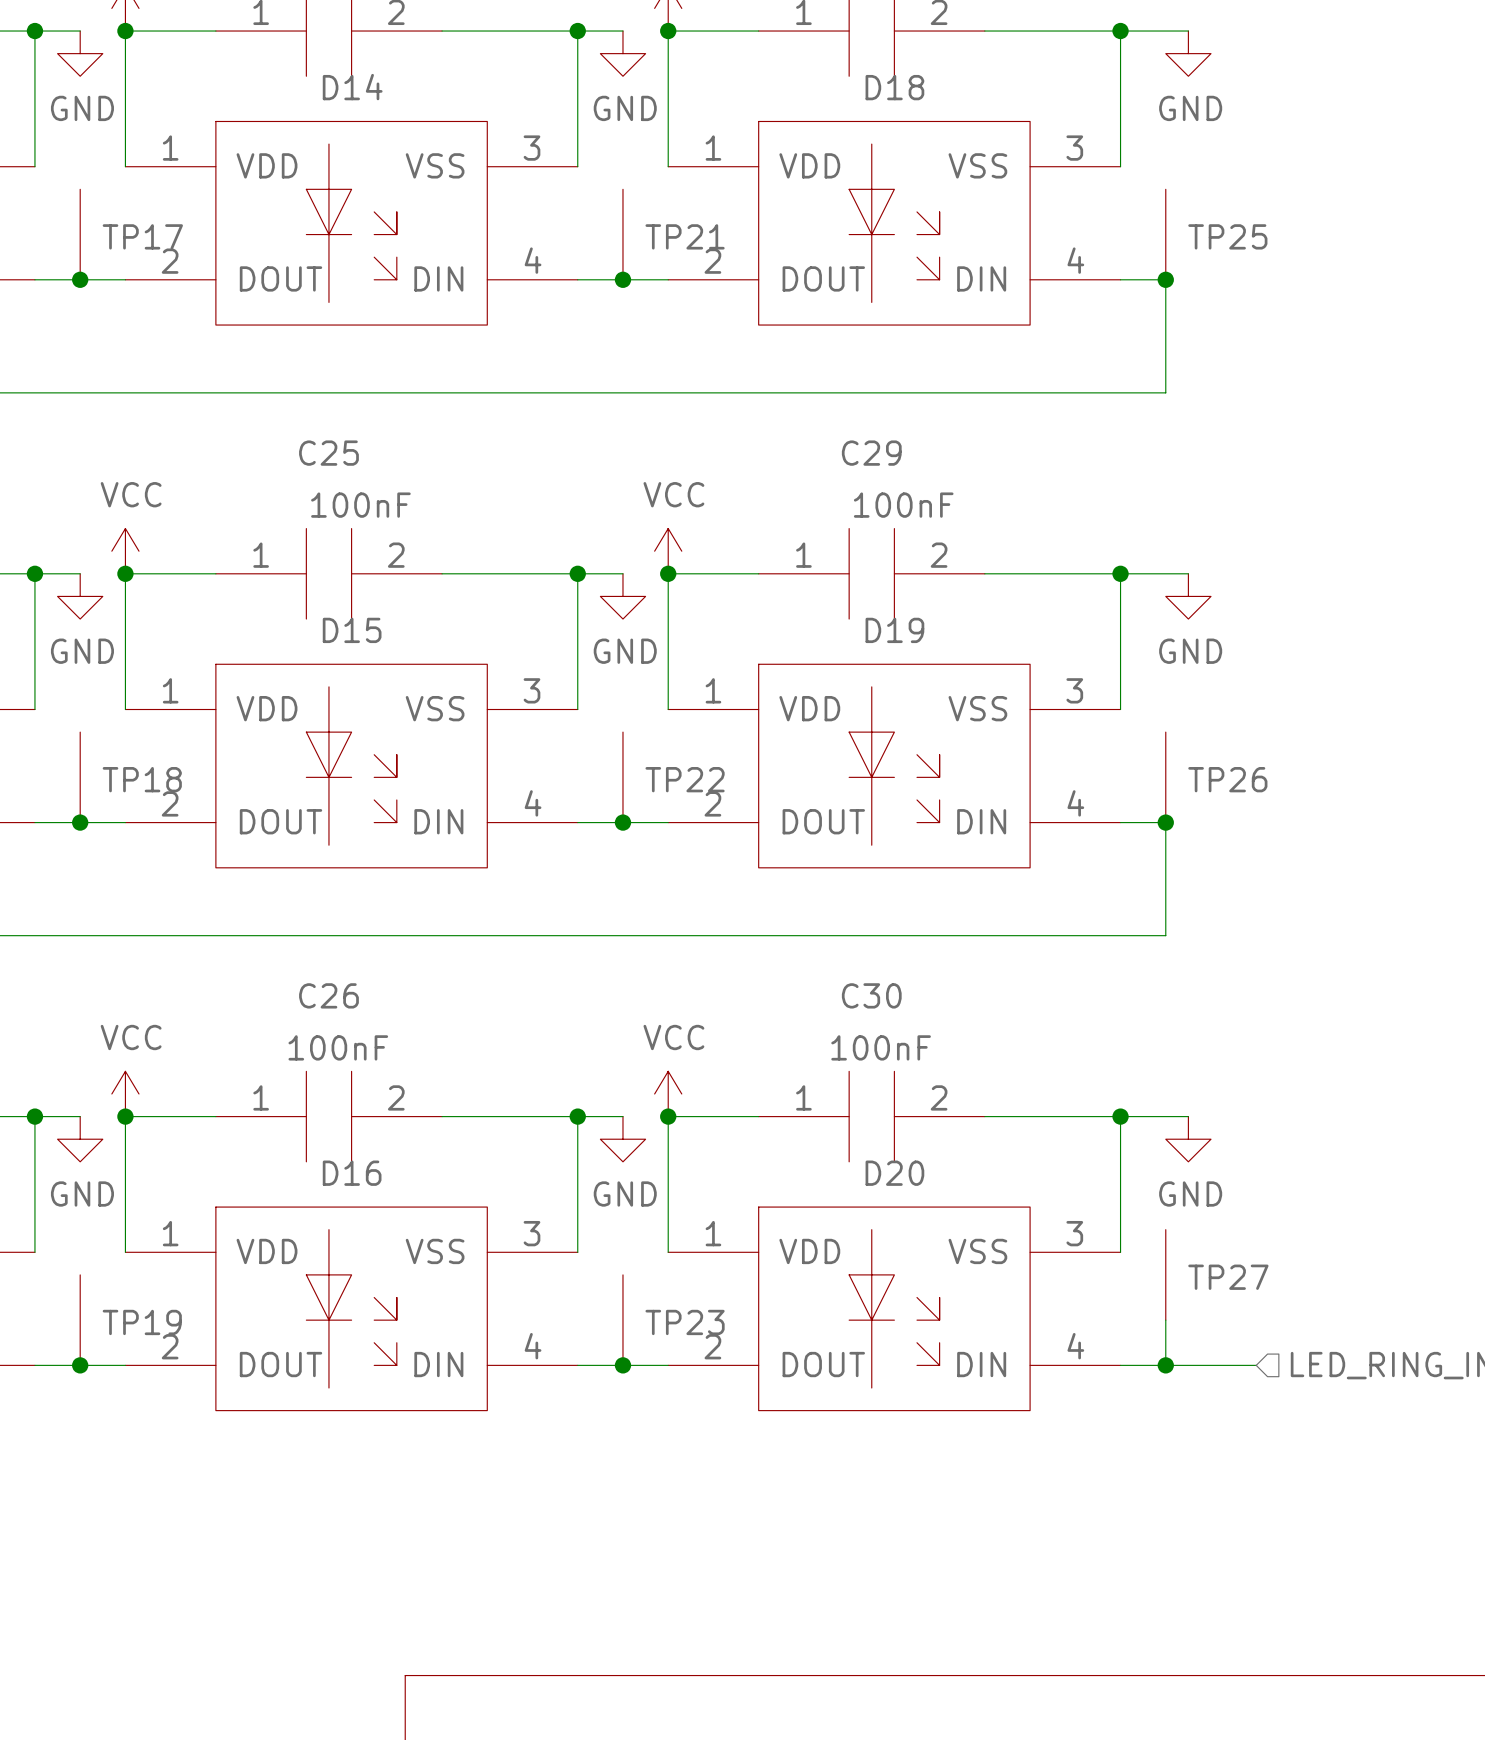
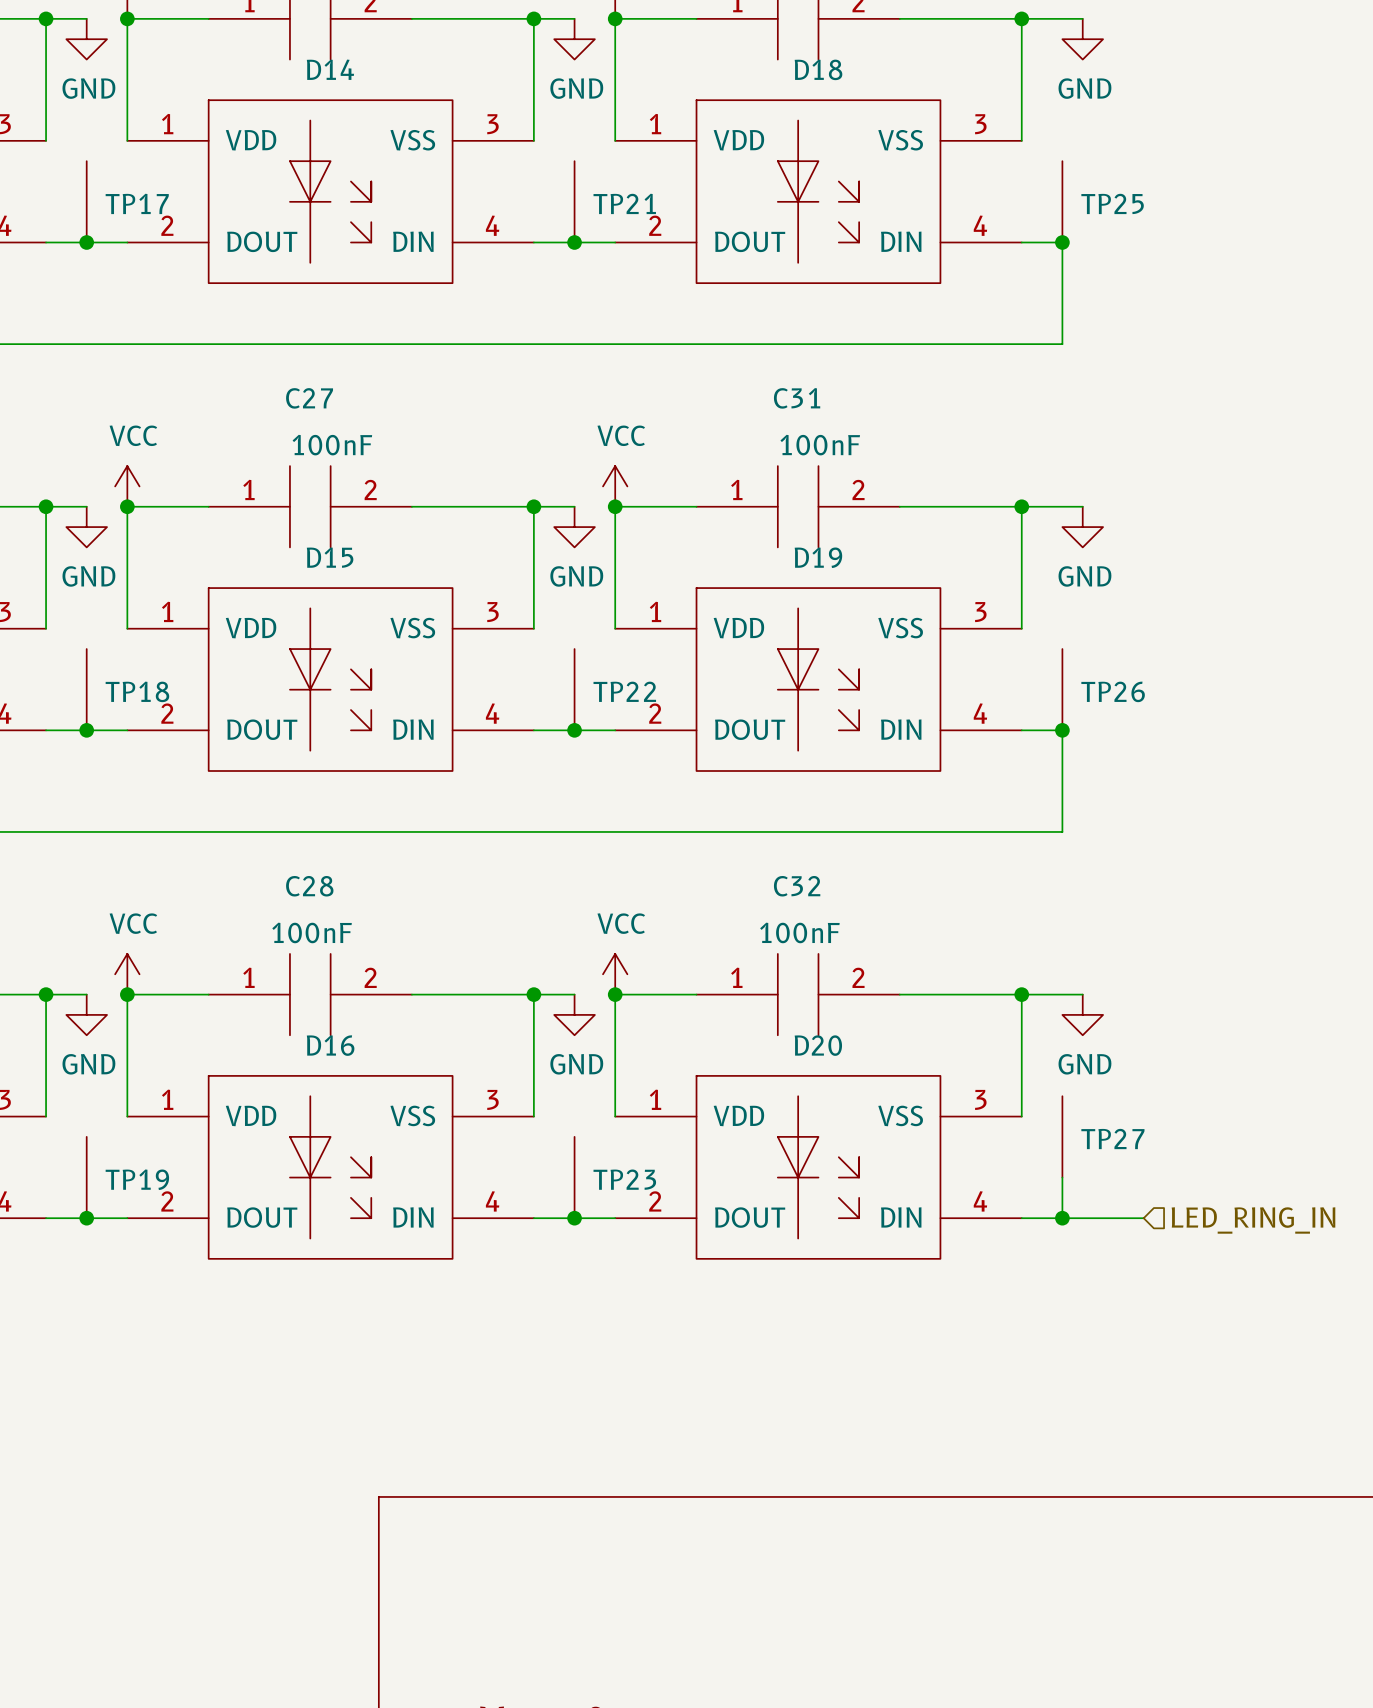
C25 name: C25 (328, 453) -> C27 (309, 398)
C29 name: C29 (871, 453) -> C31 (797, 398)
C26 name: C26 (328, 995) -> C28 (309, 886)
C30 name: C30 (871, 995) -> C32 (797, 886)

